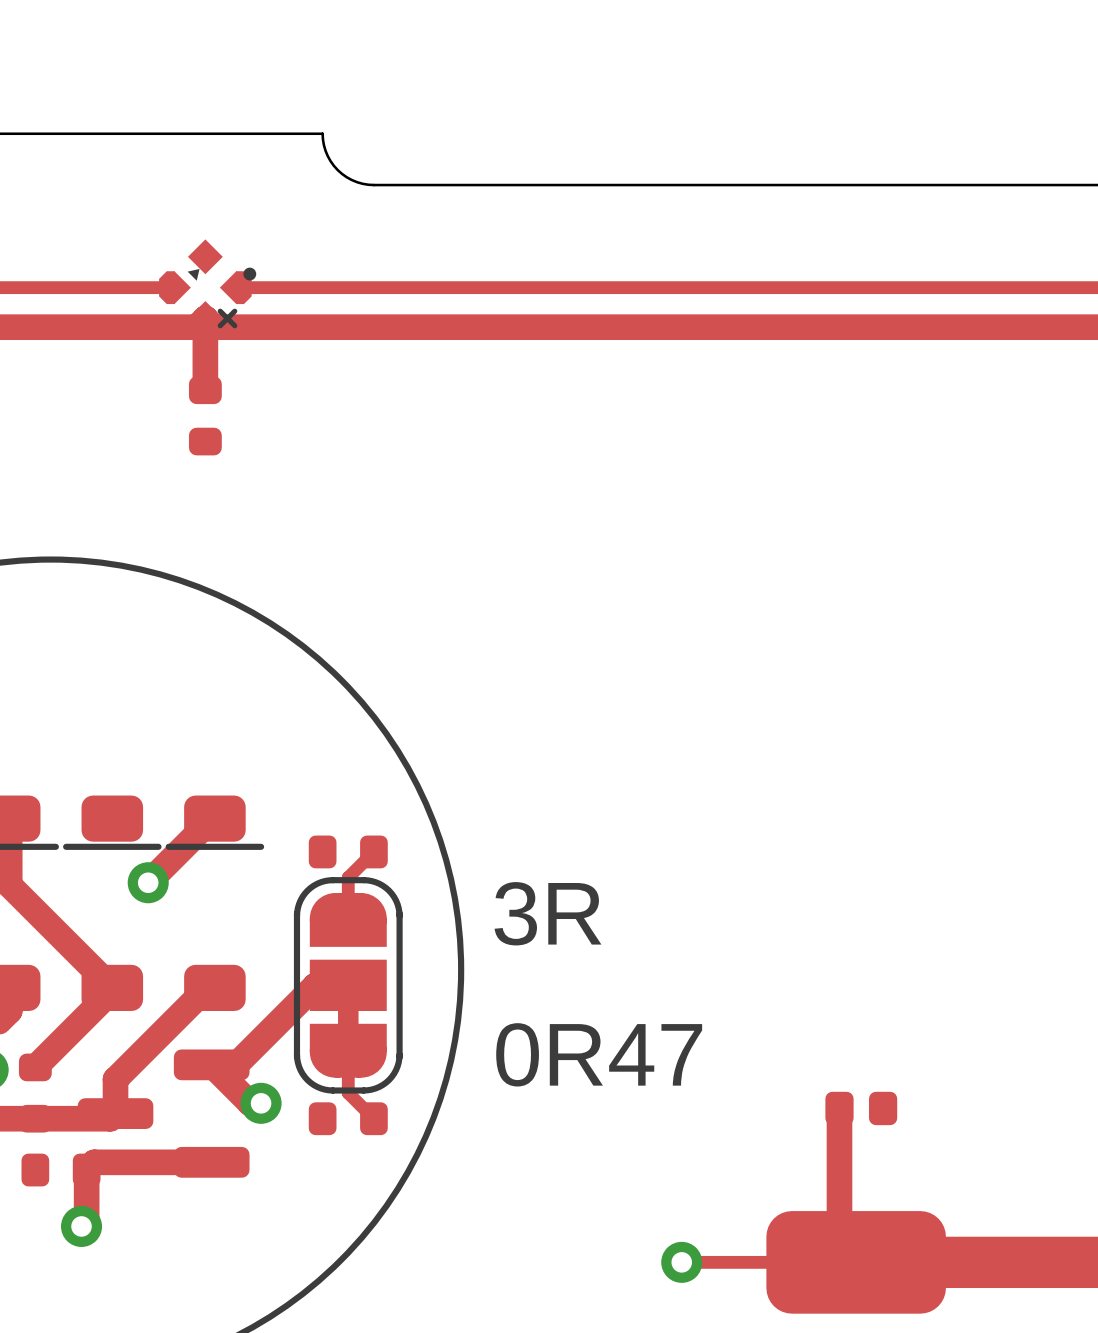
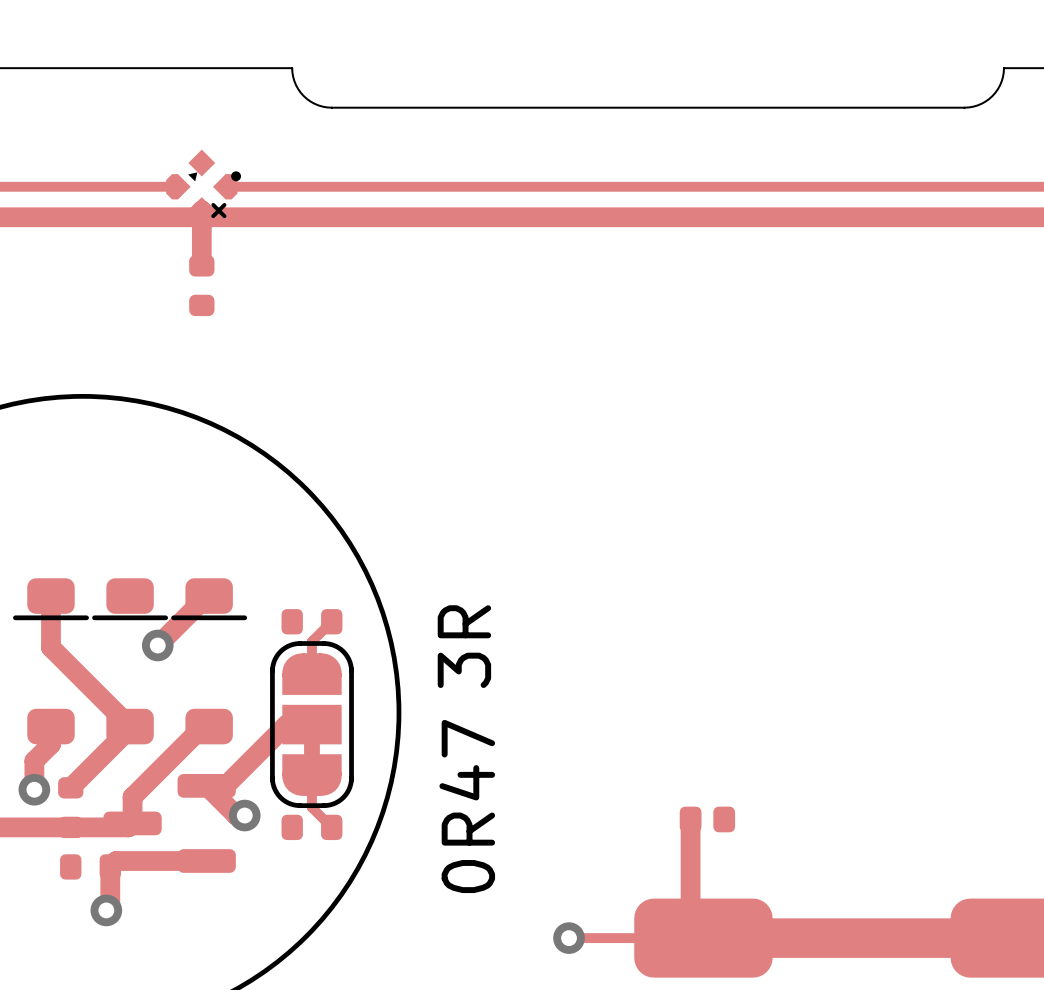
text rotation: 0° (547, 913) -> 90° counterclockwise (464, 646)
text rotation: 0° (599, 1054) -> 90° counterclockwise (467, 806)

